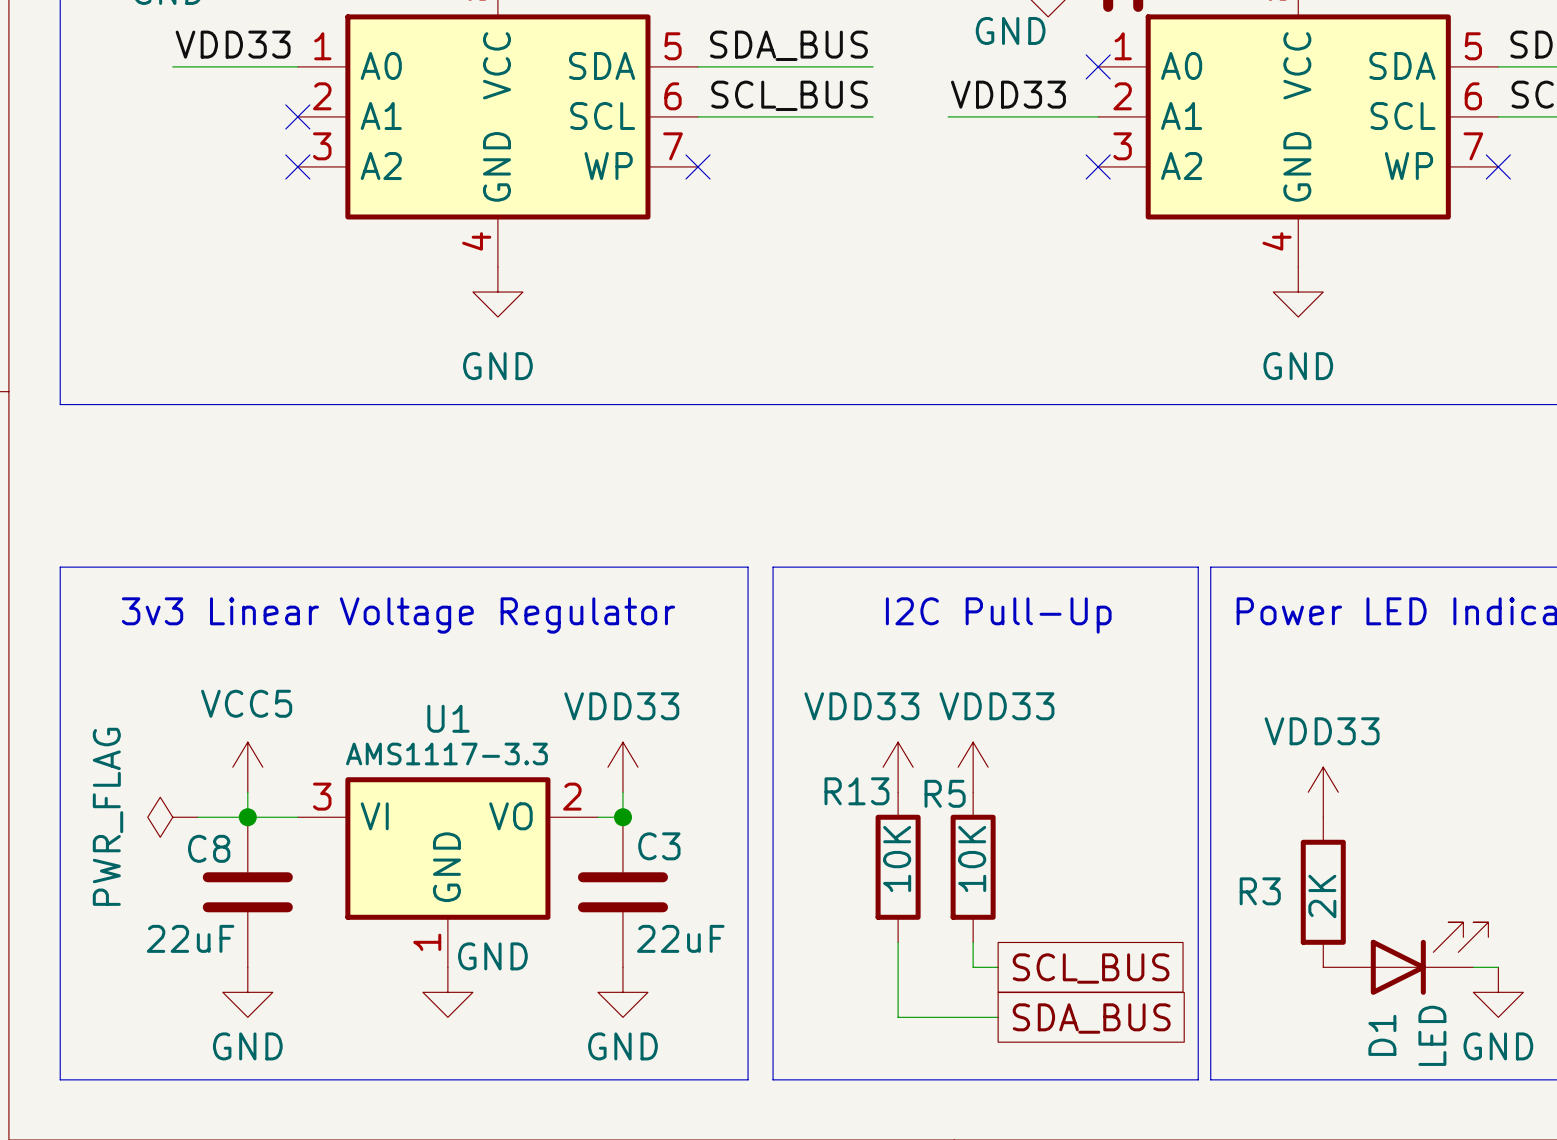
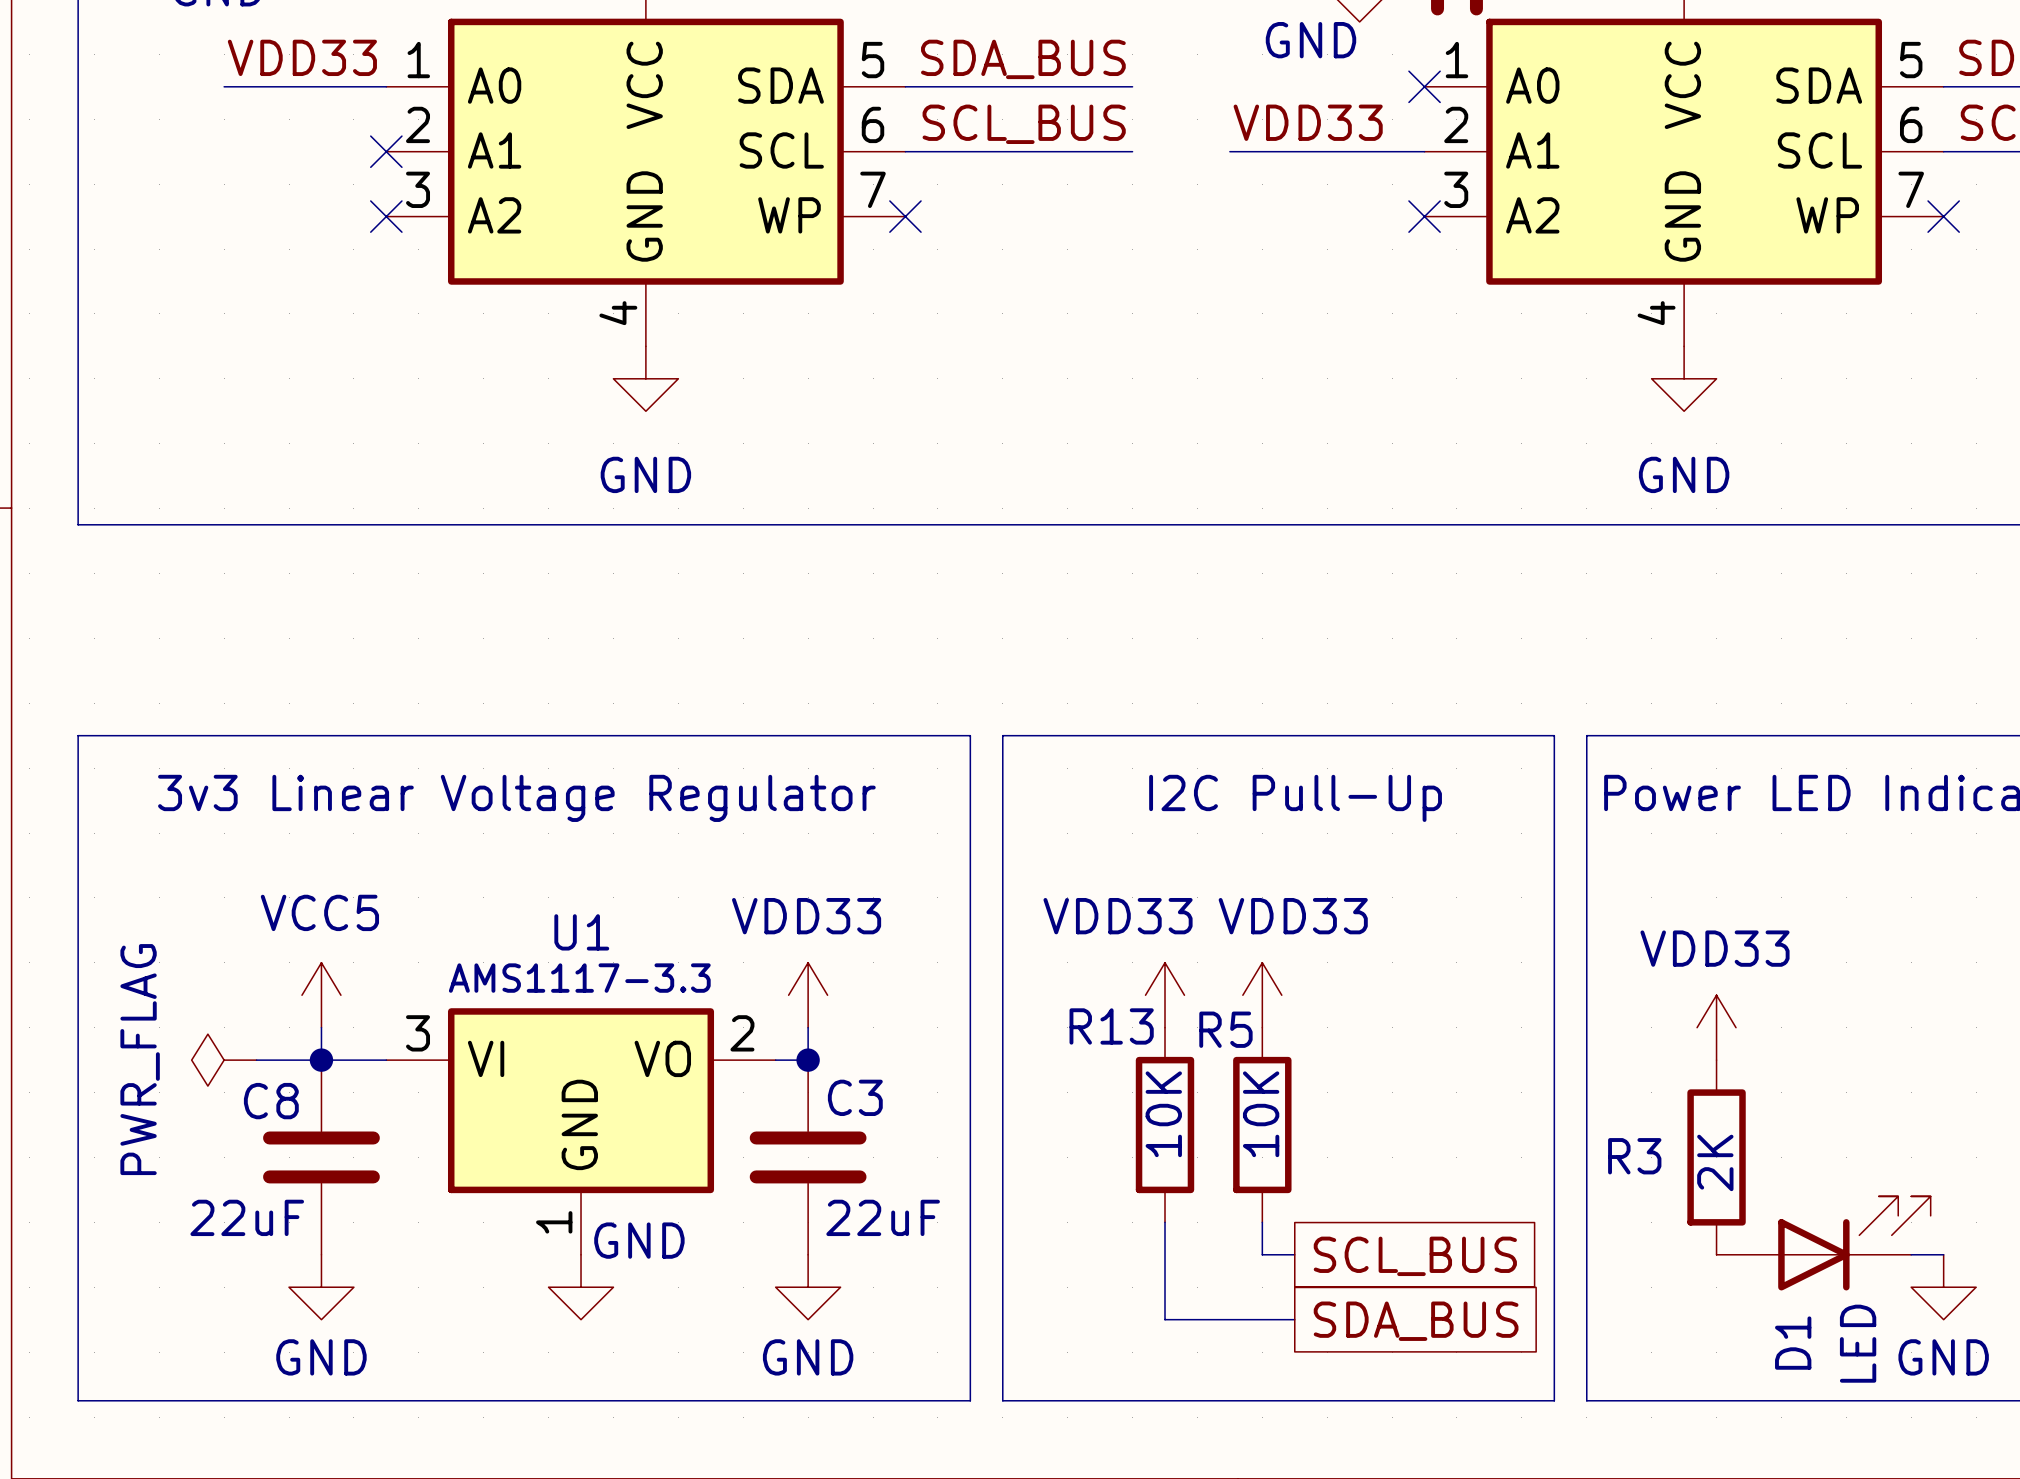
line: (1223, 567) (1210, 567) (1210, 1079) (1223, 1079) -> (1586, 735) (1586, 1400)

